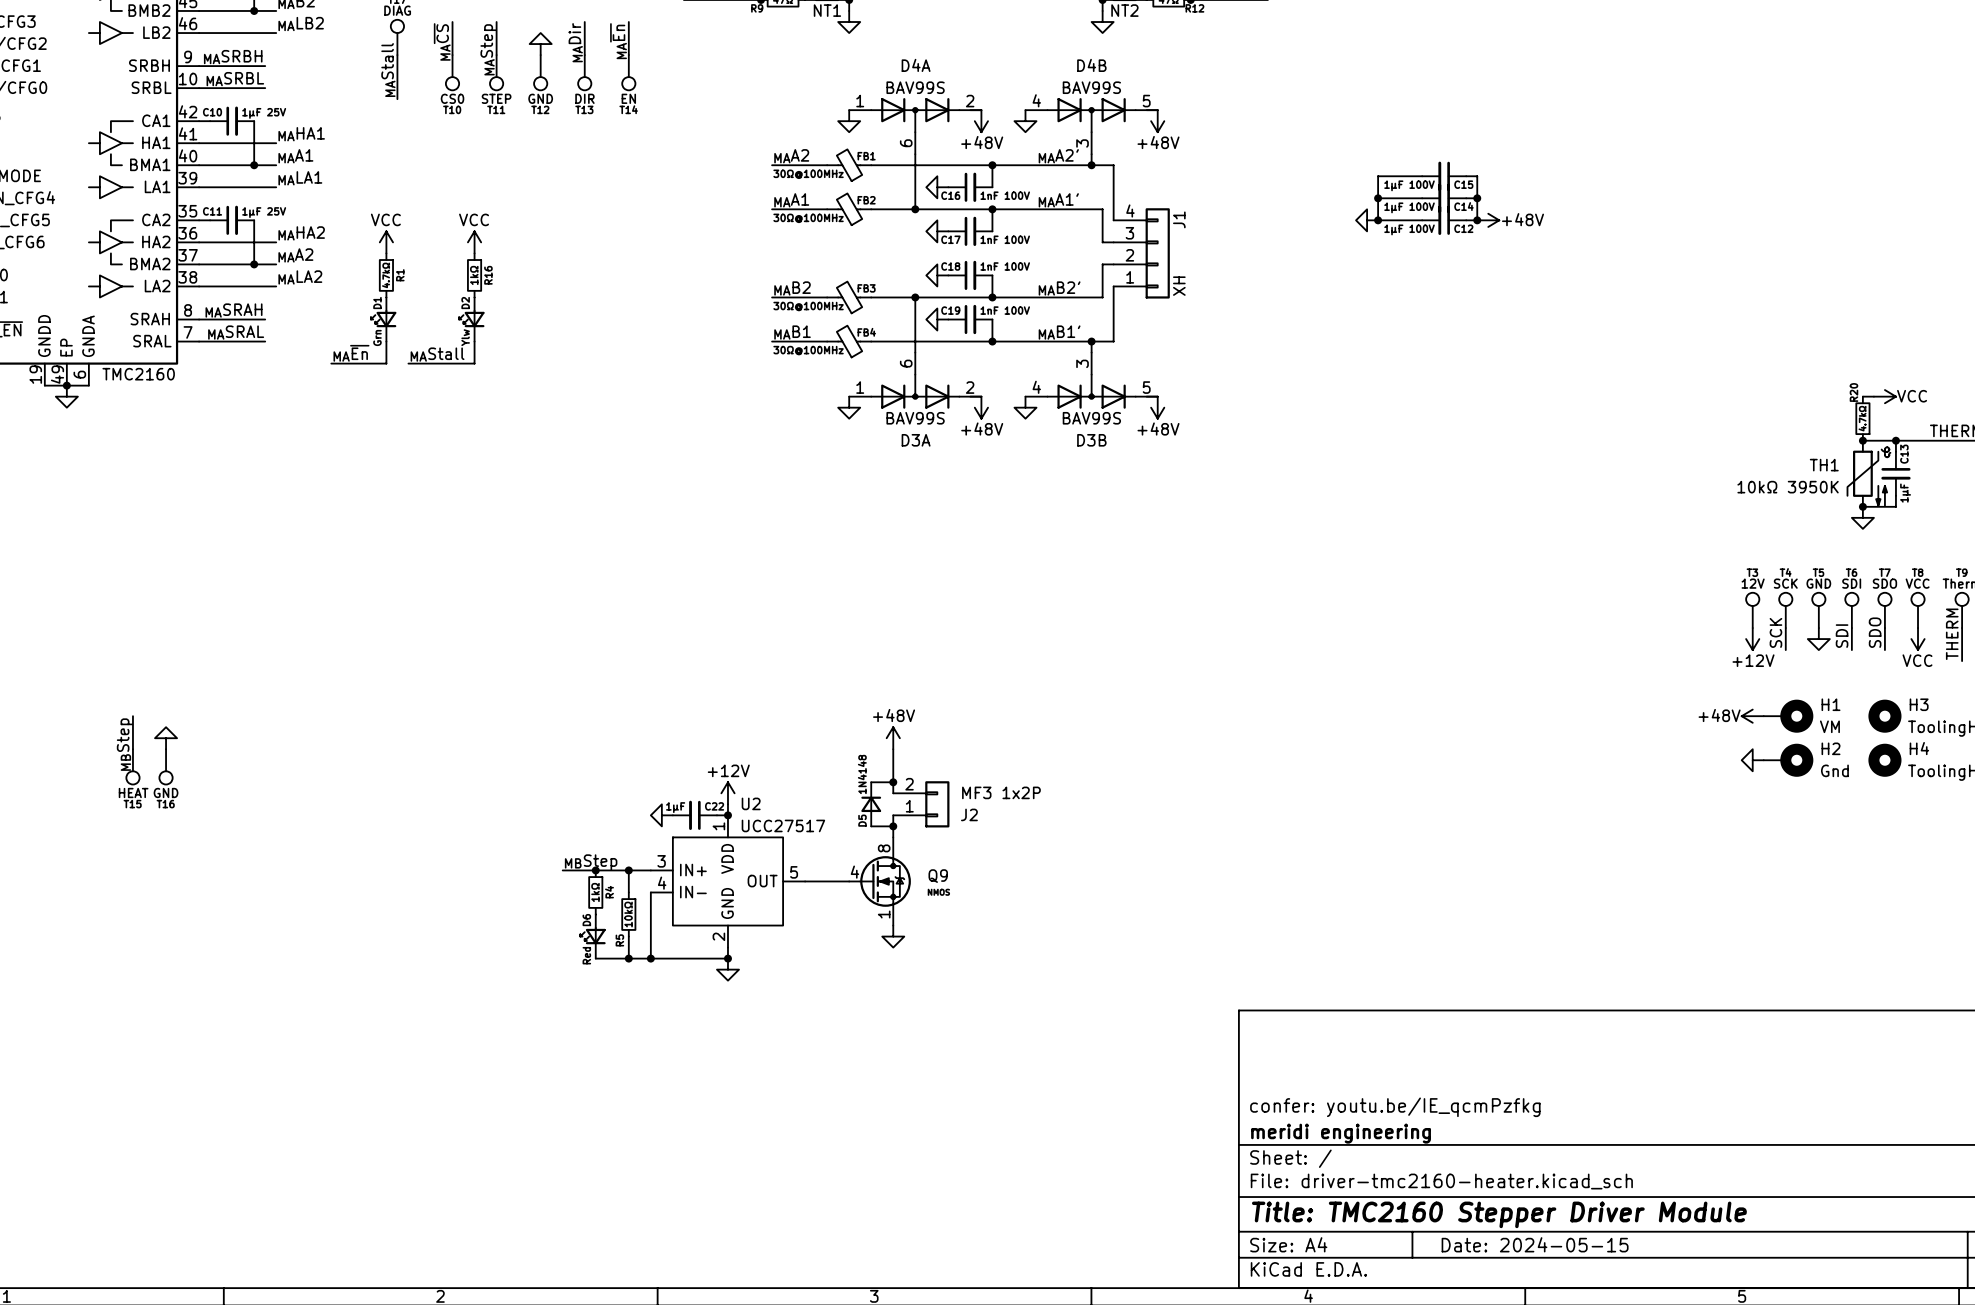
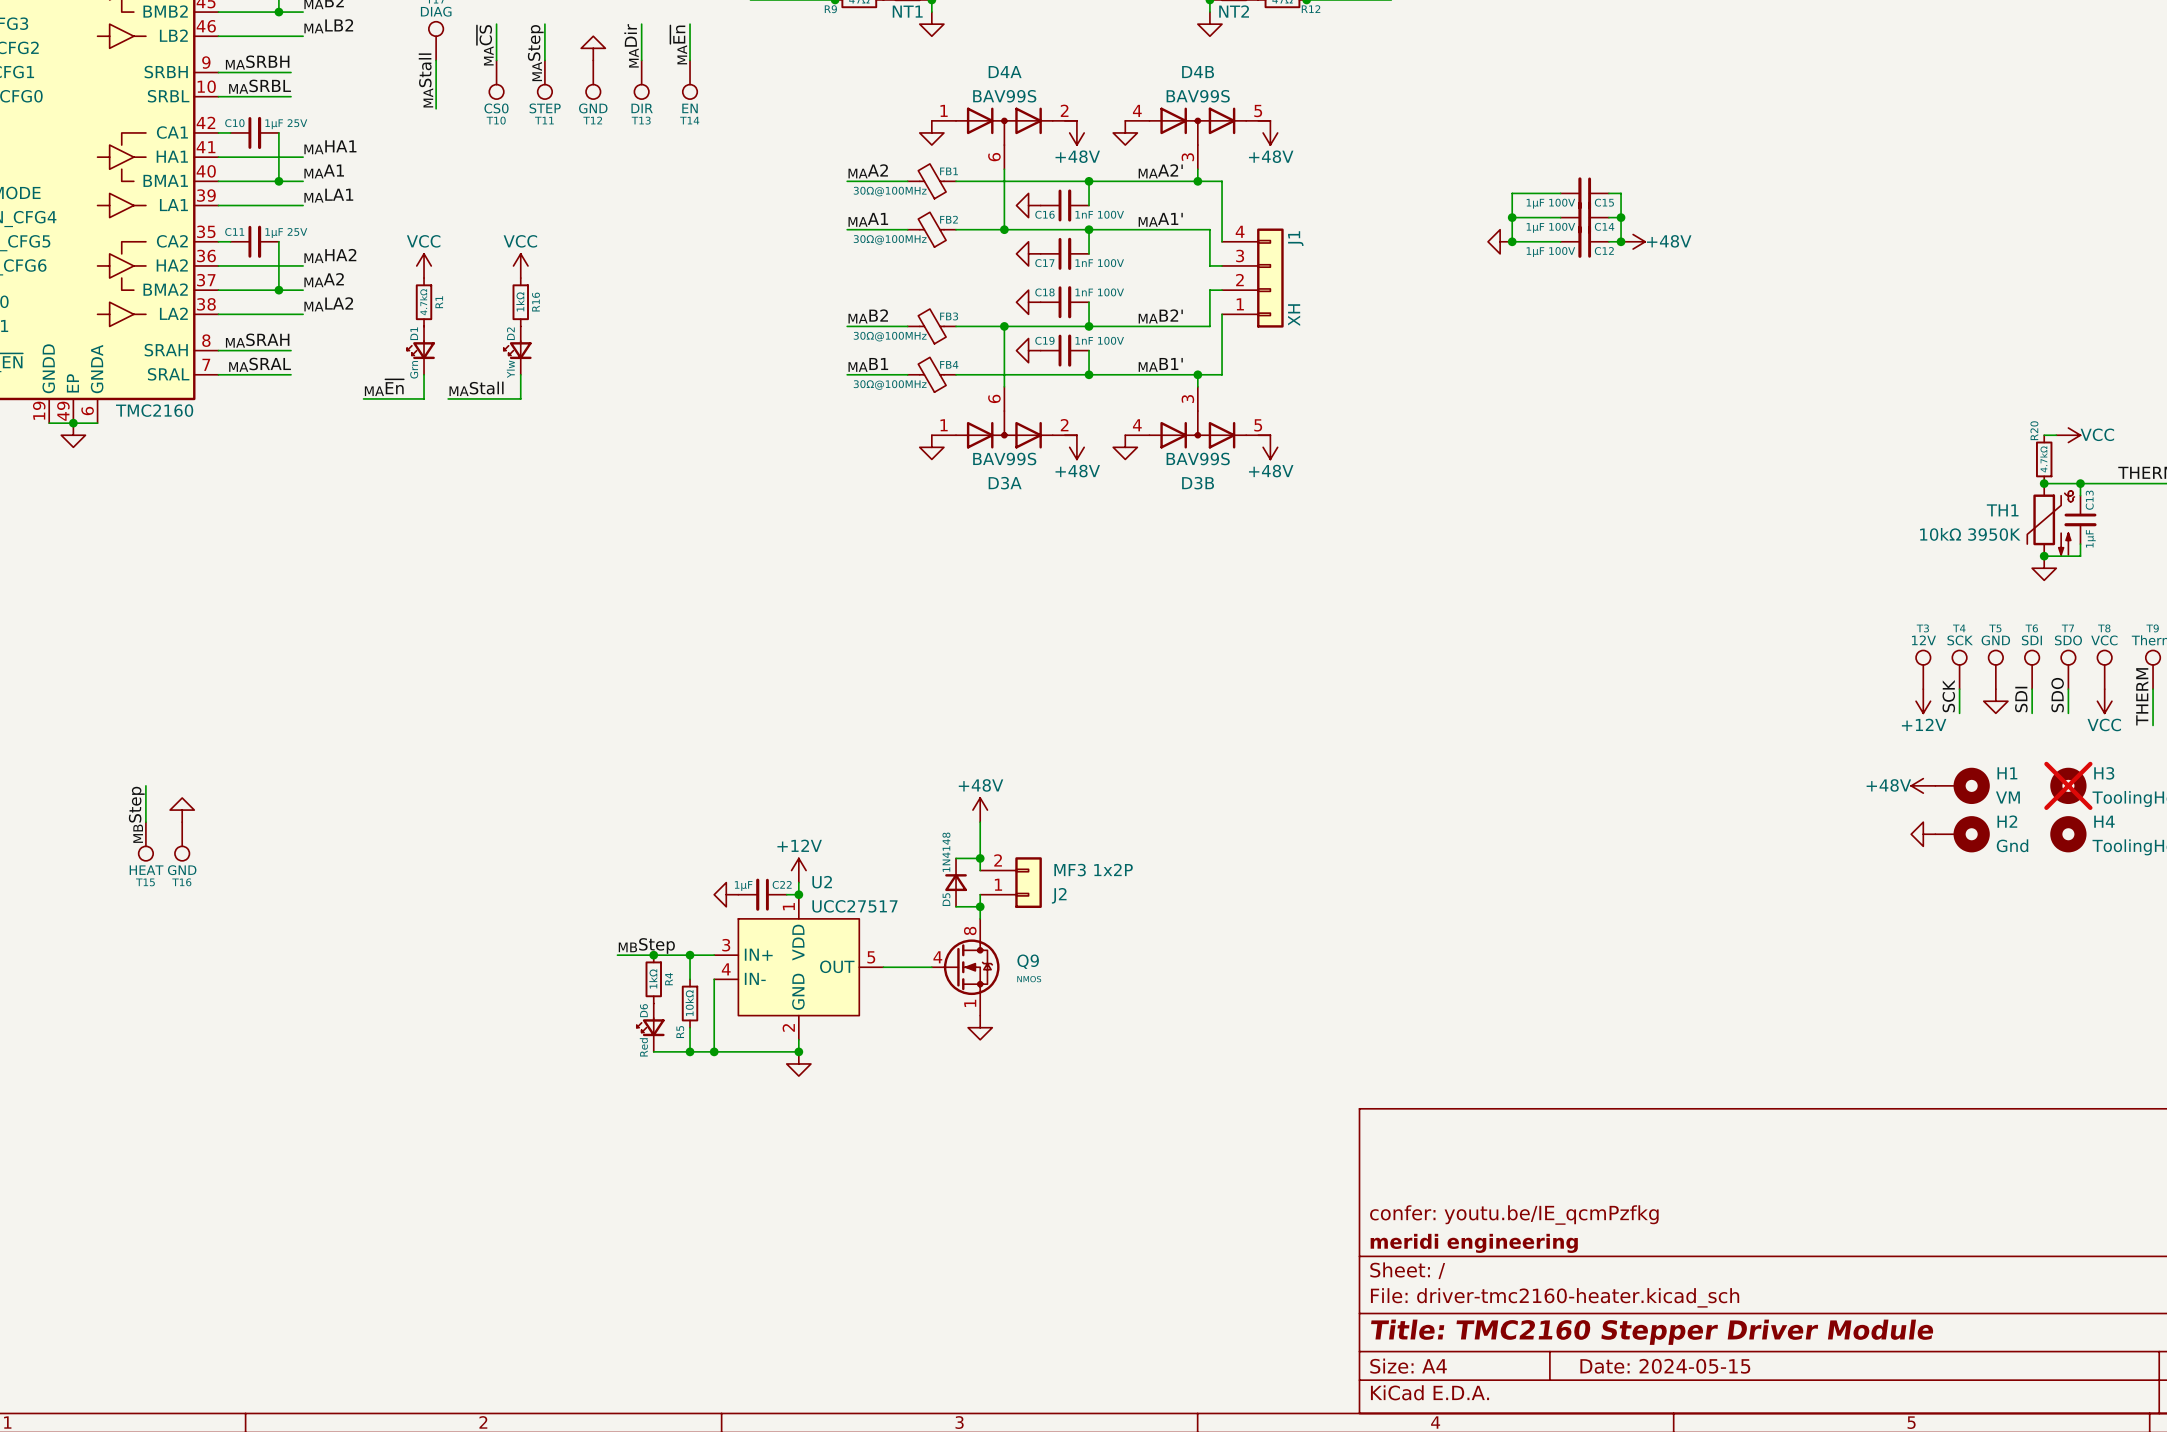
H3 do-not-place cross: none -> (2068, 785)

